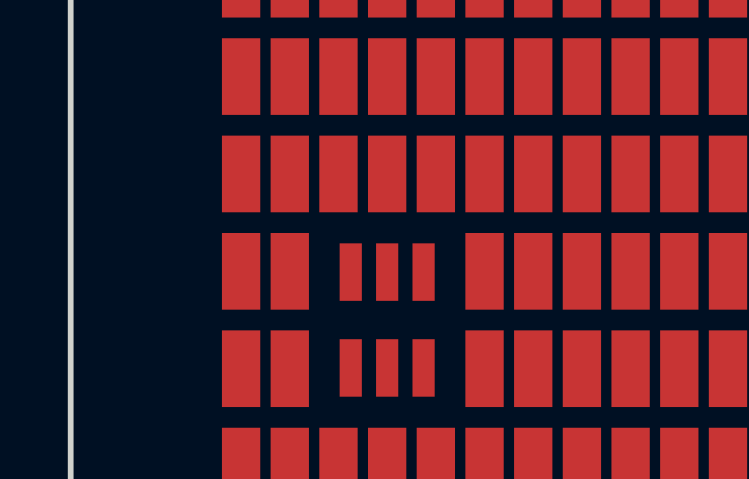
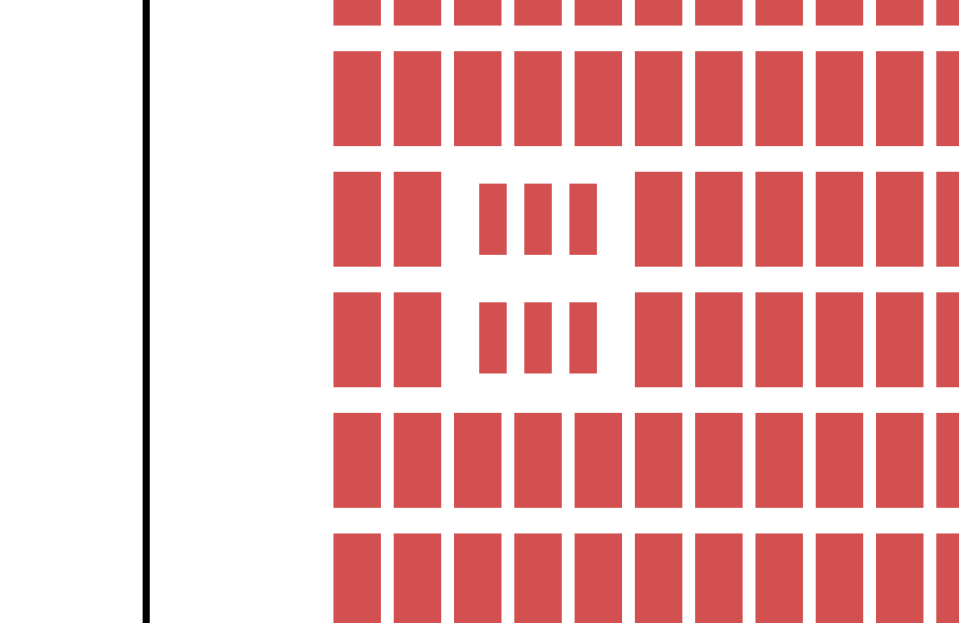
part: (338, 173) -> none
part: (387, 173) -> none
part: (435, 173) -> none
part position: (387, 320) -> (538, 278)
part: none -> (477, 460)
part: none -> (538, 460)
part: none -> (598, 460)

